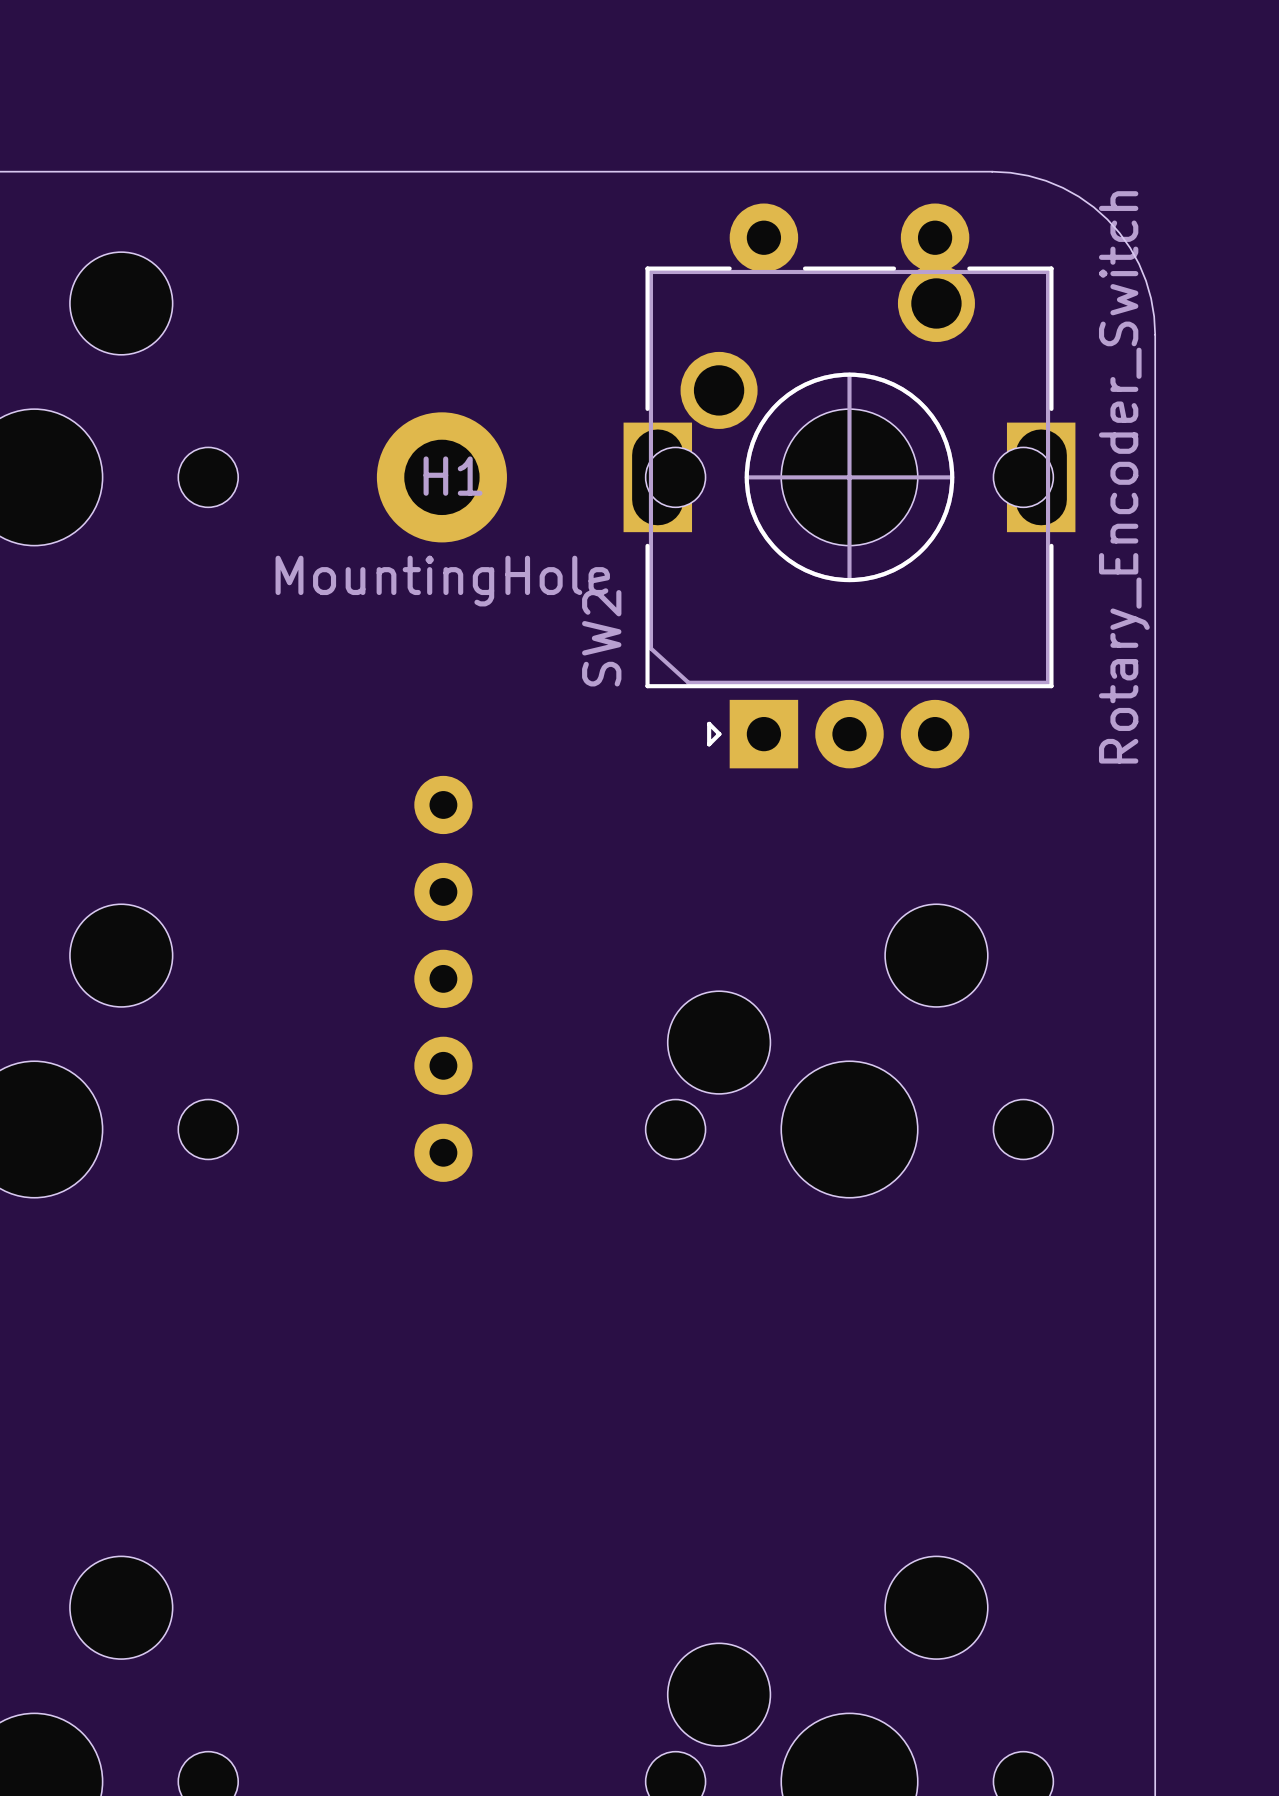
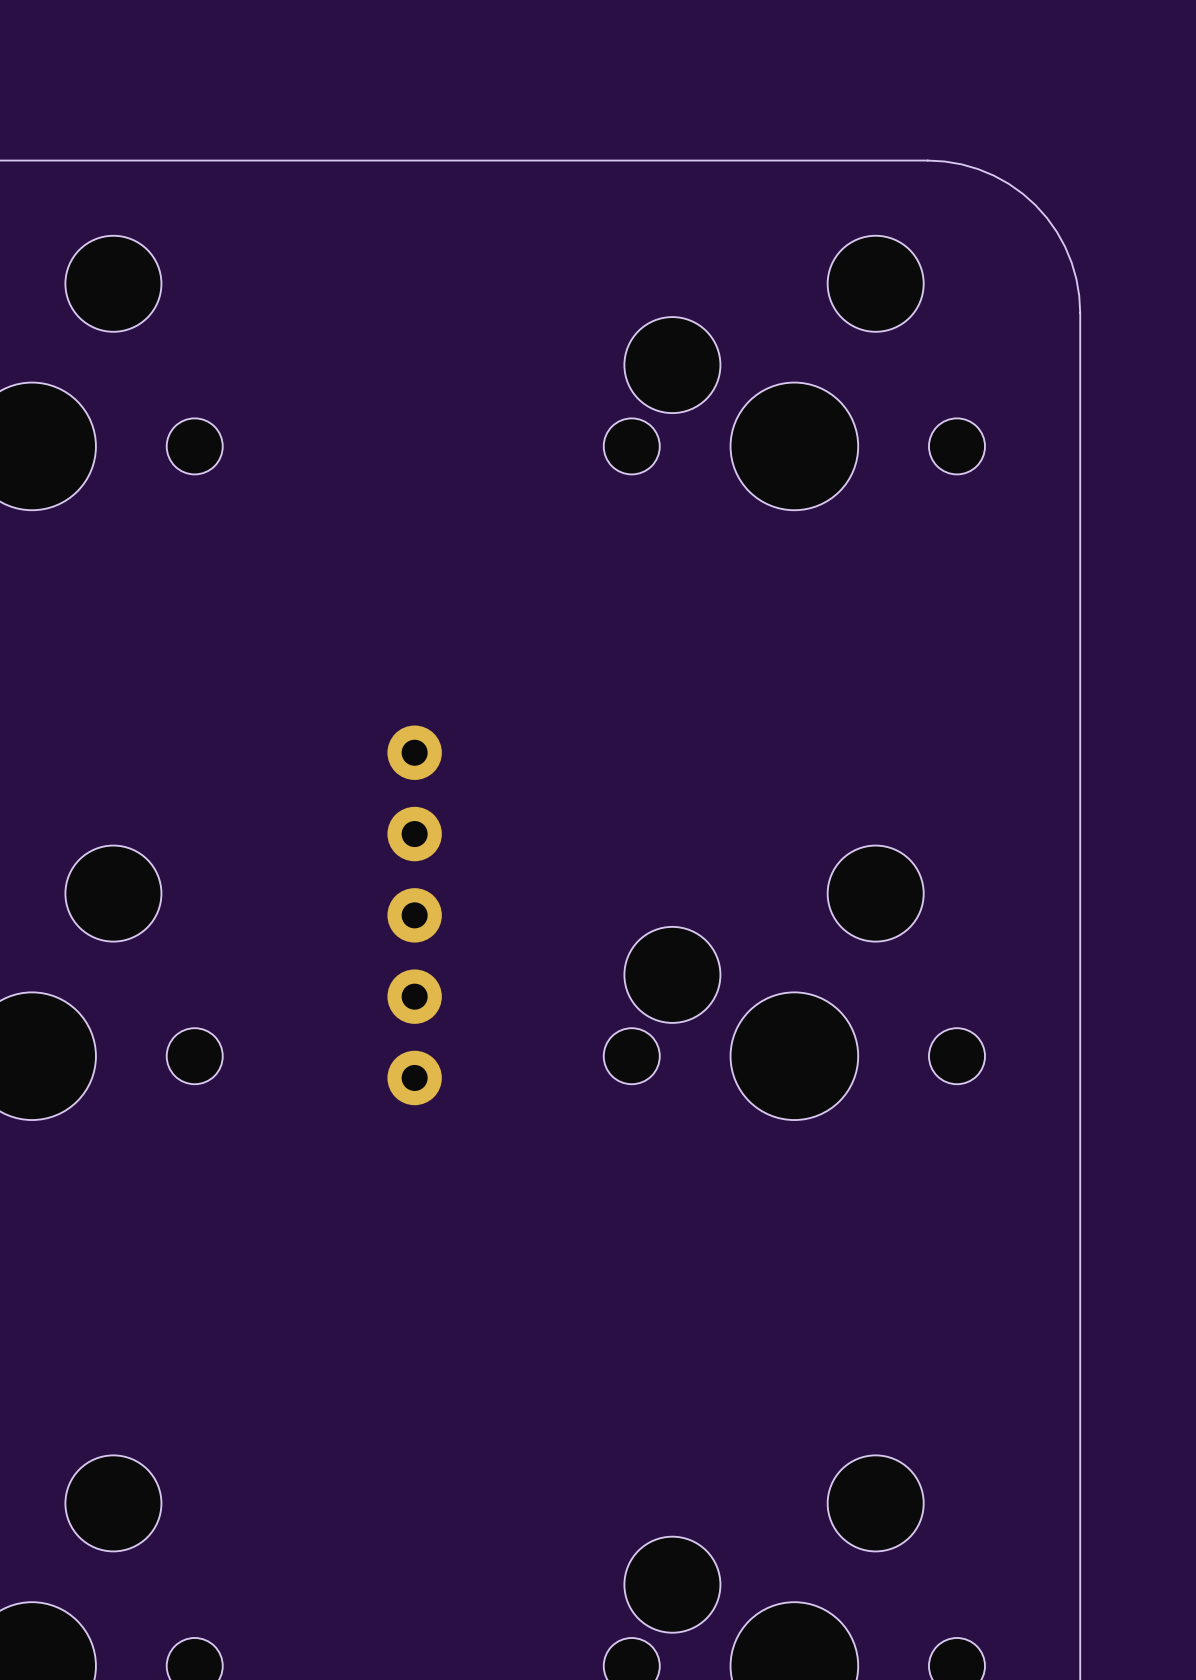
part footprint: [645, 264, 1054, 546] -> [603, 235, 986, 511]
H1: MountingHole (441, 477) -> none
SW2: Rotary_Encoder_Switch (849, 485) -> none

